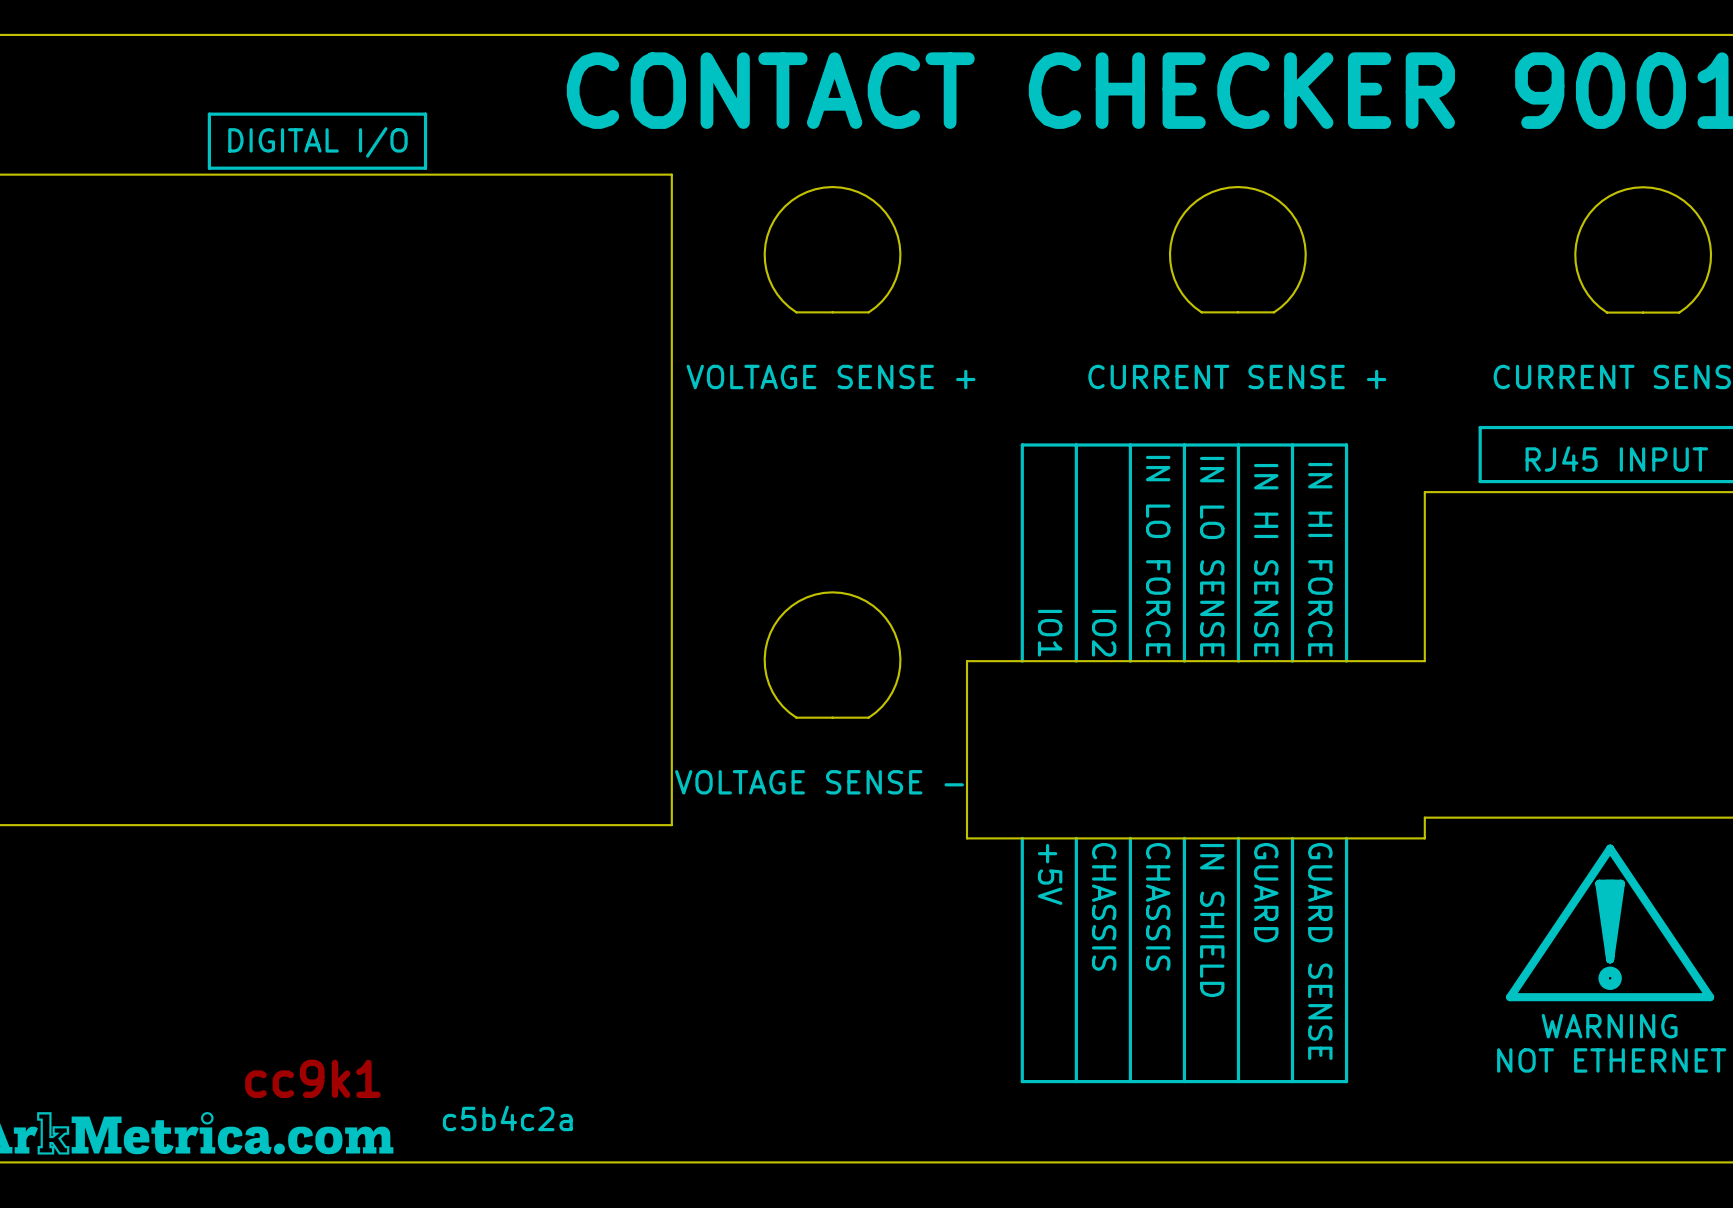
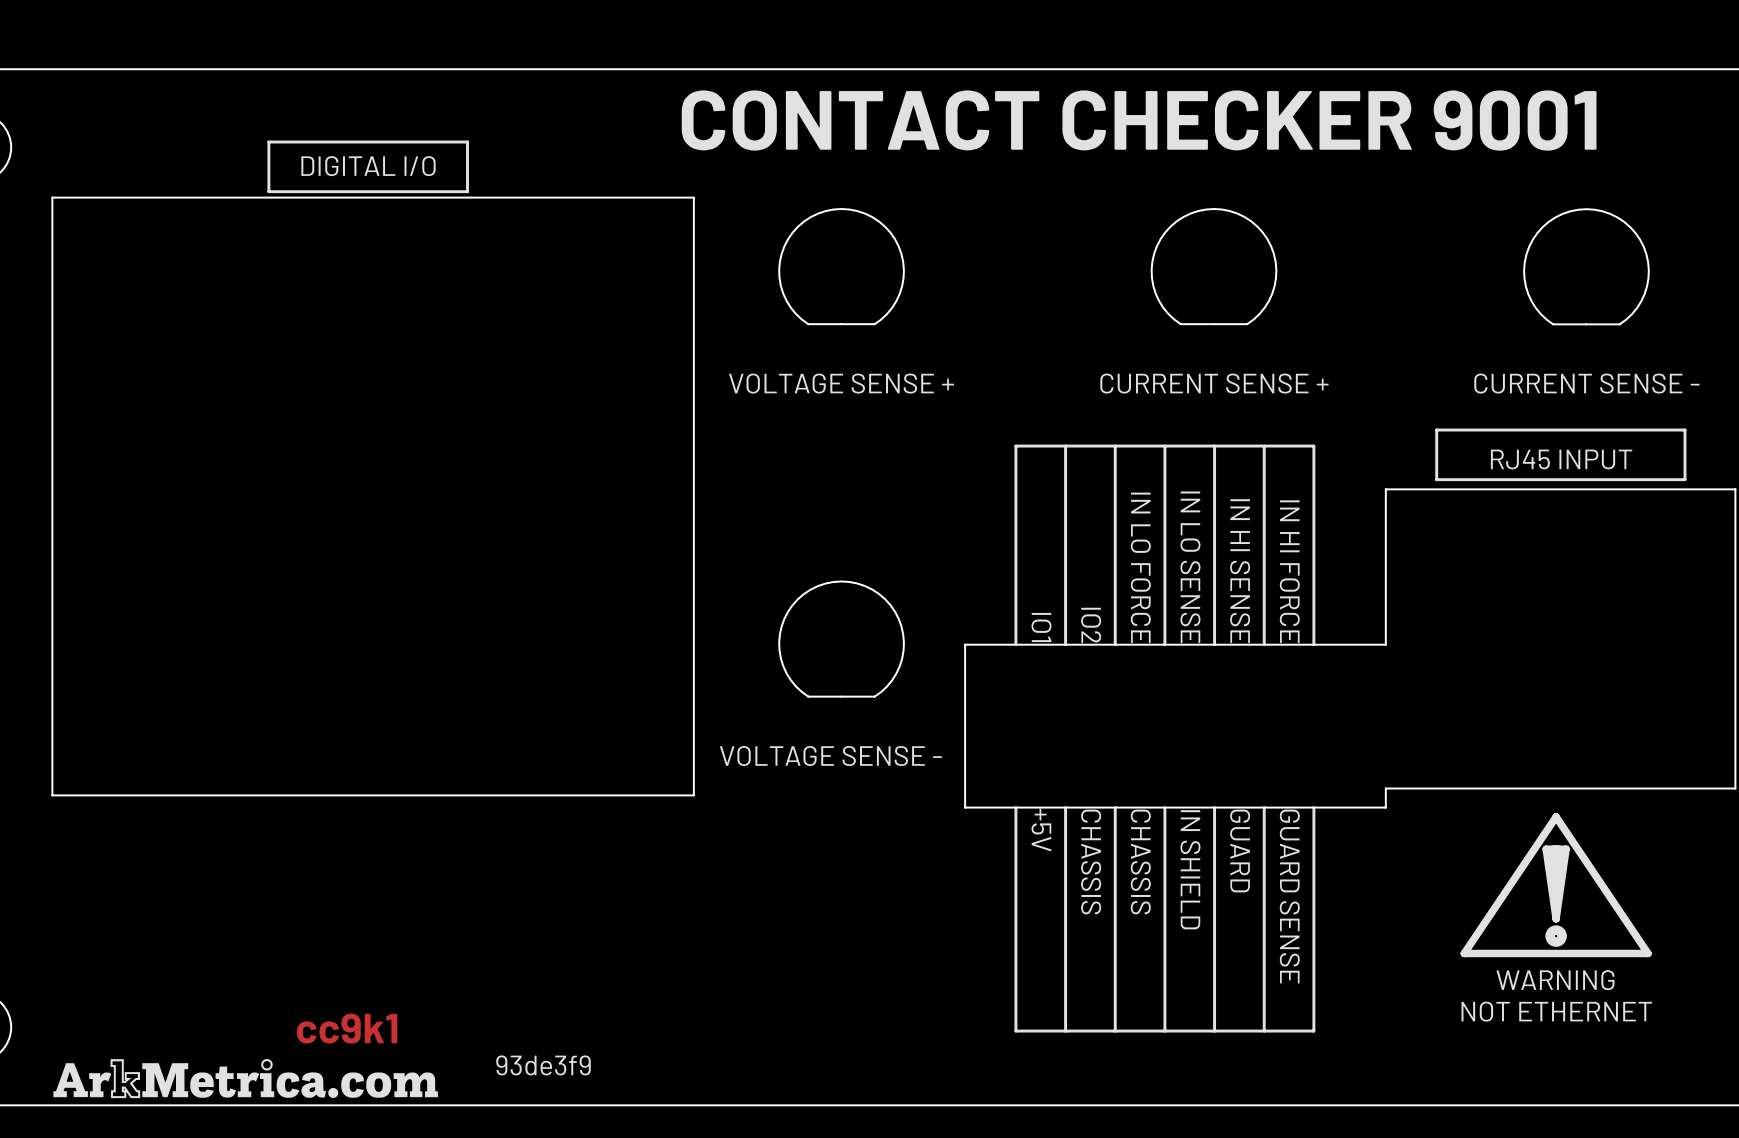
text: c5b4c2a (507, 1118) -> 93de3f9 (543, 1065)

